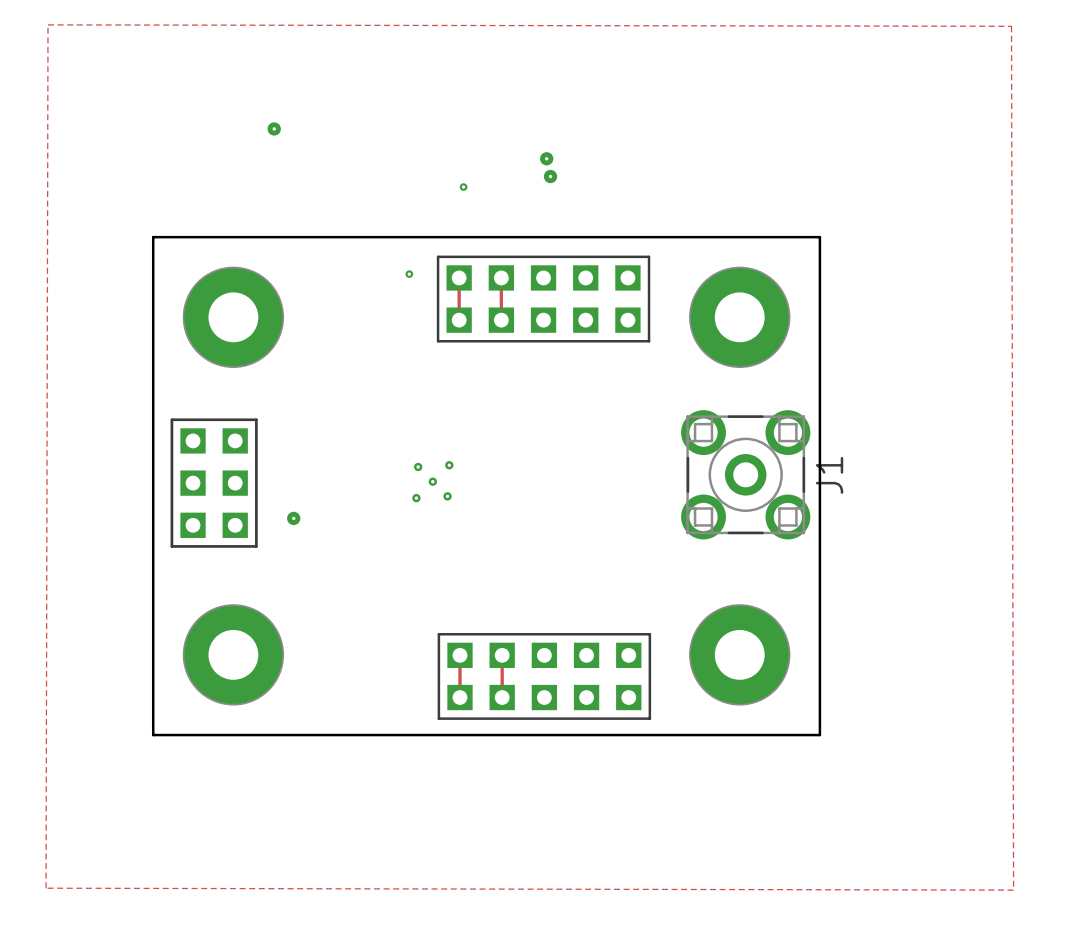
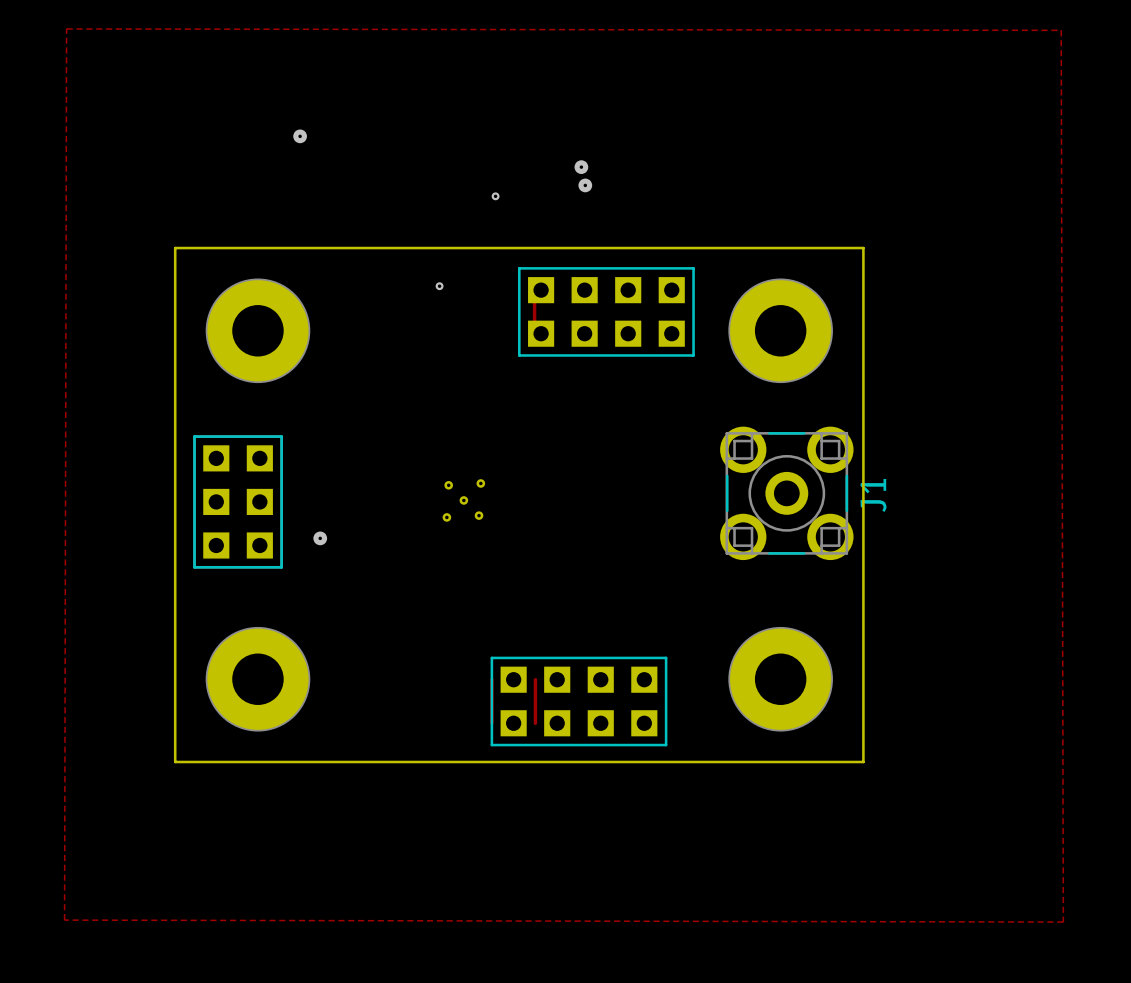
track: (459, 277) (459, 320) -> none
part: (543, 299) -> none
part: none -> (606, 311)
part footprint: [437, 632, 652, 720] -> [490, 656, 668, 747]

